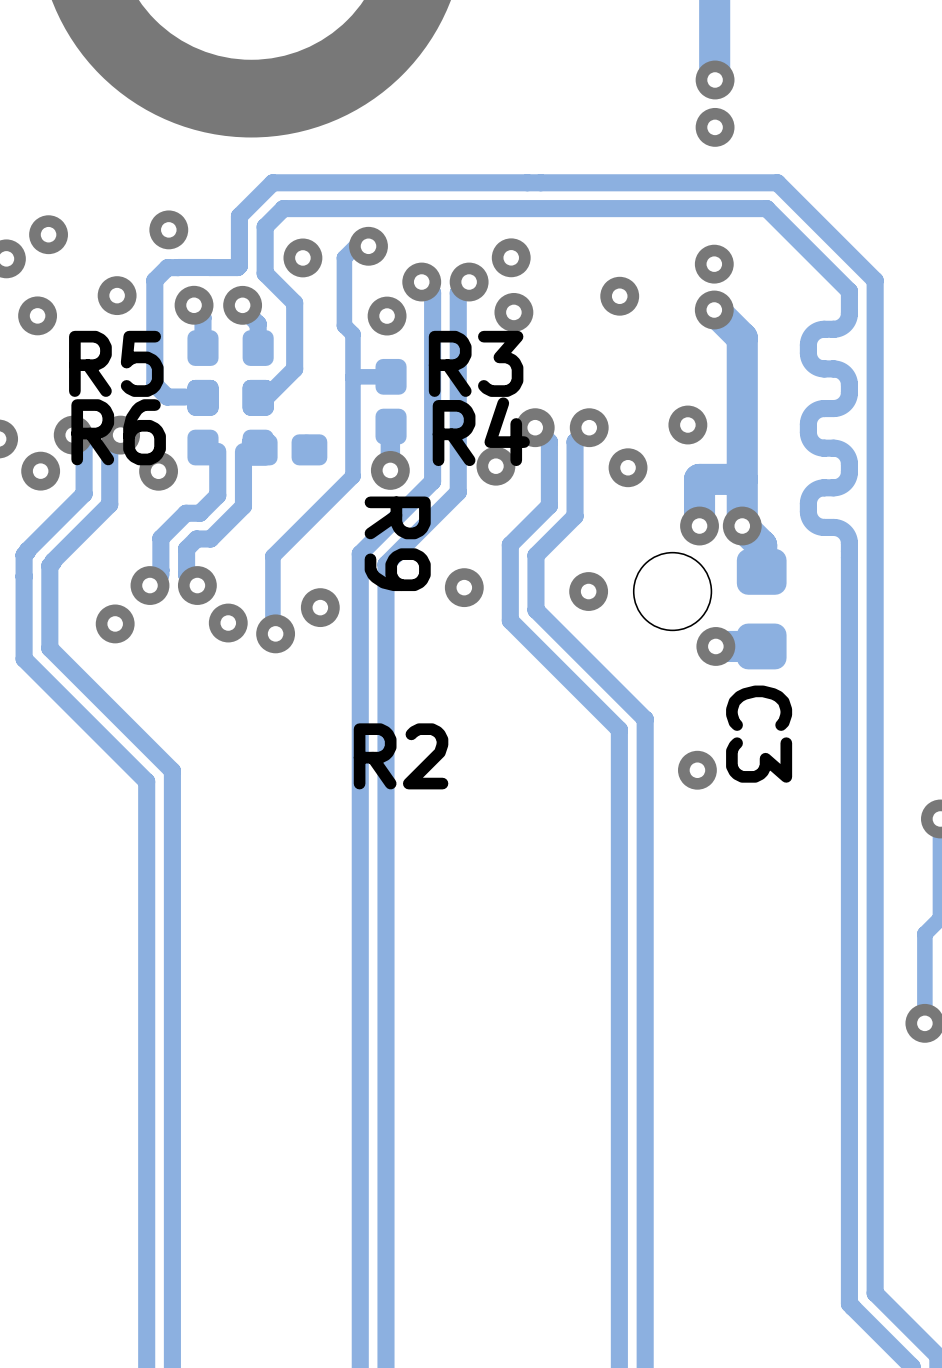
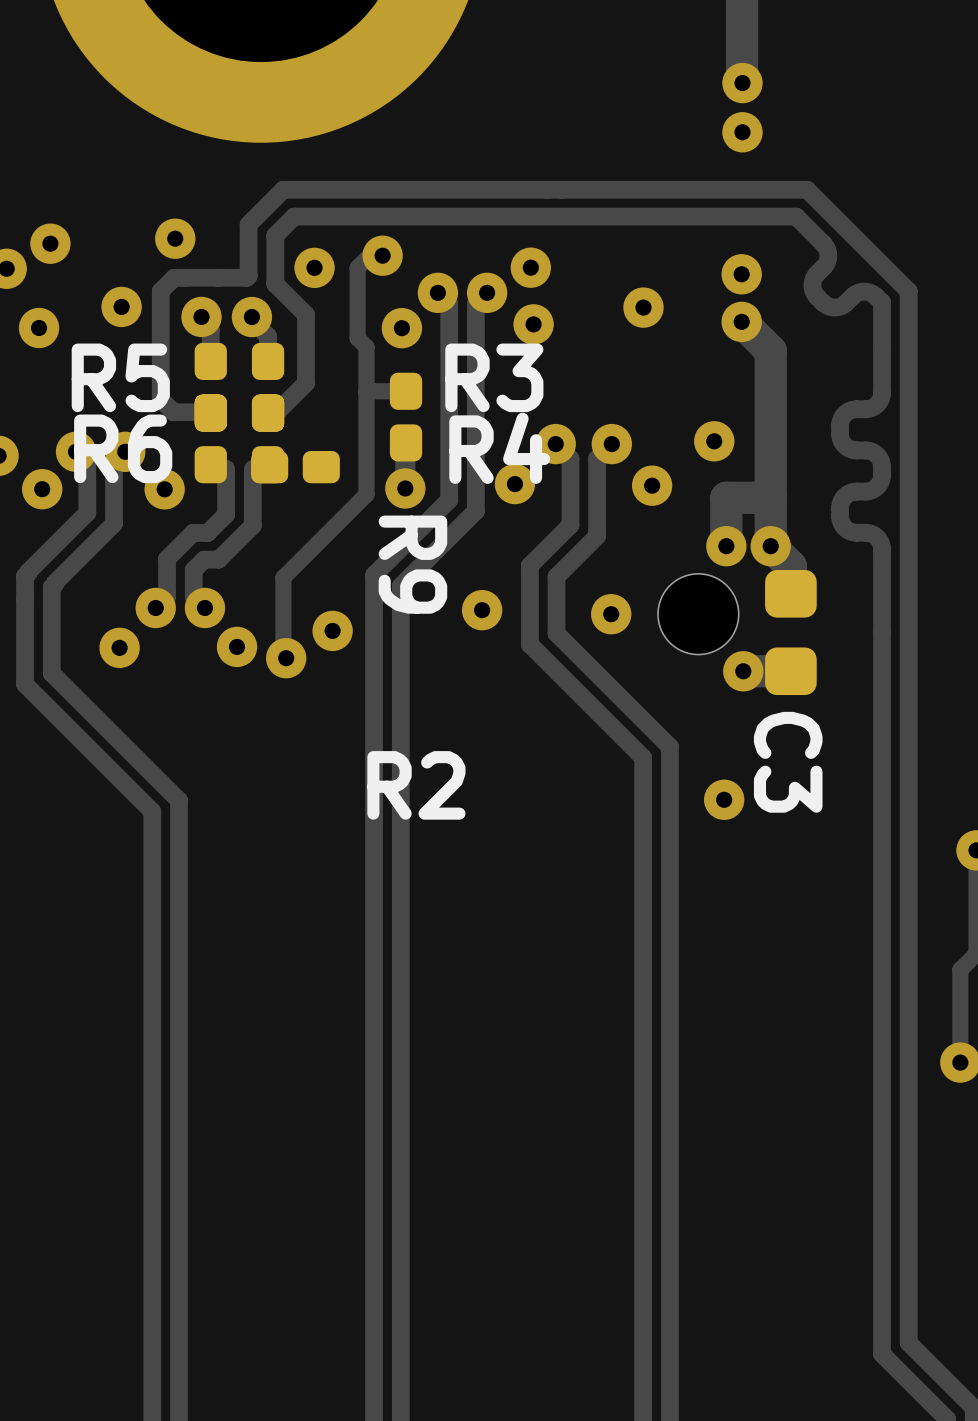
track: (793, 235) (843, 285) -> (823, 244) (827, 251) (827, 259) (814, 276) (812, 285) (814, 294) (823, 302) (830, 307) (838, 307) (855, 294) (862, 291) (869, 292) (875, 296)
track: (849, 313) (847, 320) (843, 325) (837, 328) (817, 330) (810, 336) (808, 345) (808, 356) (813, 364) (820, 368) (842, 371) (847, 377) (849, 384) (848, 397) (843, 405) (837, 408) (819, 409) (813, 413) (809, 419) (808, 434) (811, 442) (819, 447) (837, 448) (843, 451) (848, 458) (849, 471) (847, 478) (842, 485) (820, 488) (813, 492) (808, 500) (808, 515) (811, 521) (817, 525) (842, 529) (847, 534) (849, 543) -> (882, 325) (880, 399) (870, 408) (847, 411) (842, 416) (840, 425) (841, 439) (846, 446) (852, 450) (870, 451) (878, 456) (881, 465) (881, 478) (878, 485) (872, 489) (847, 494) (841, 500) (840, 508) (841, 521) (846, 529) (852, 532) (870, 533) (878, 538) (881, 547) (882, 564)

